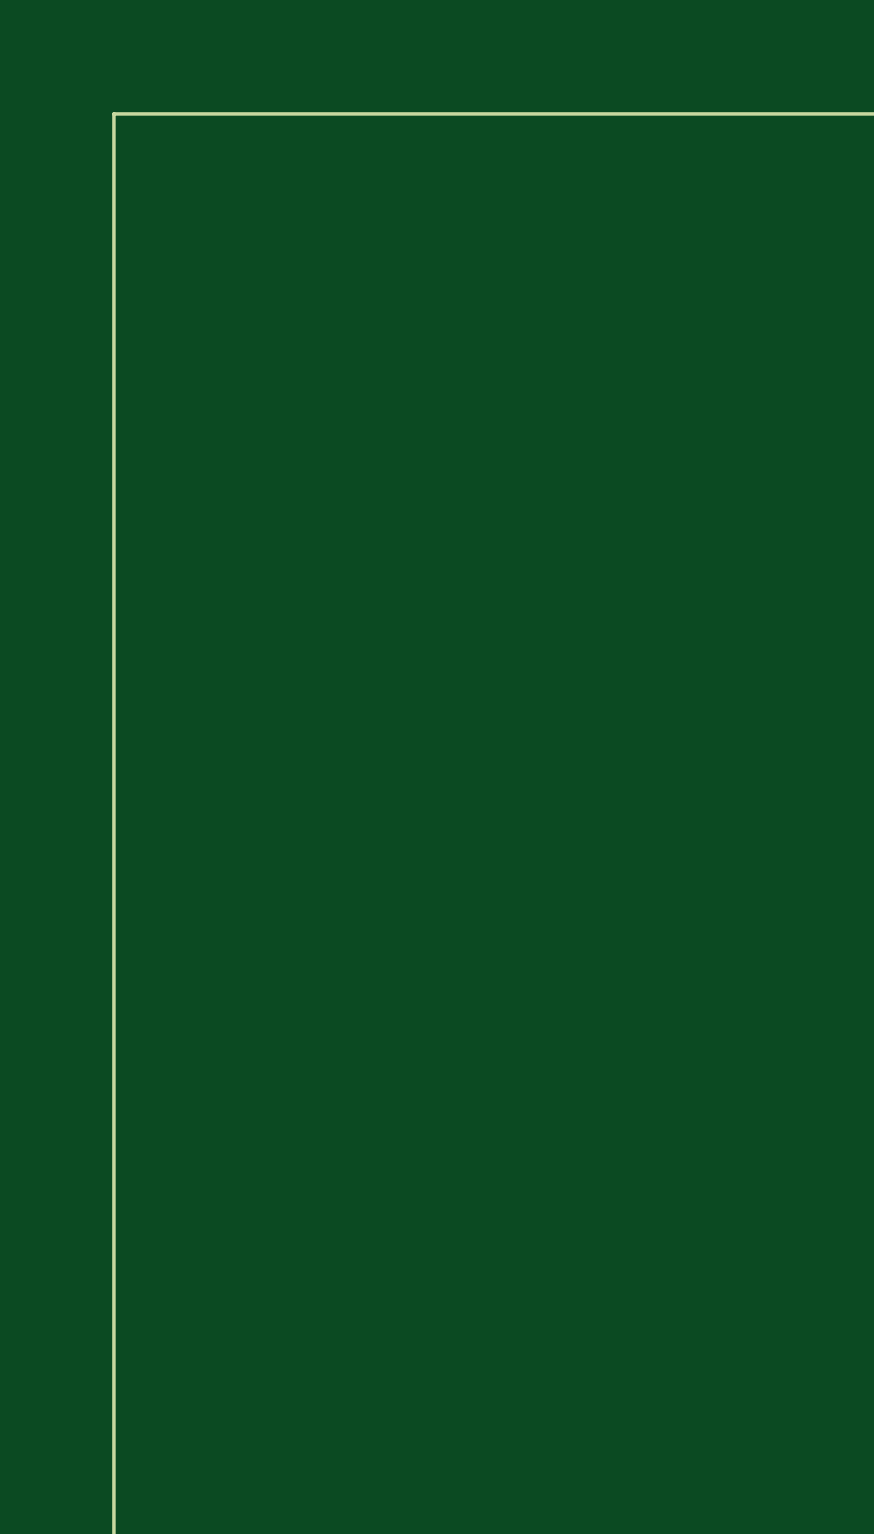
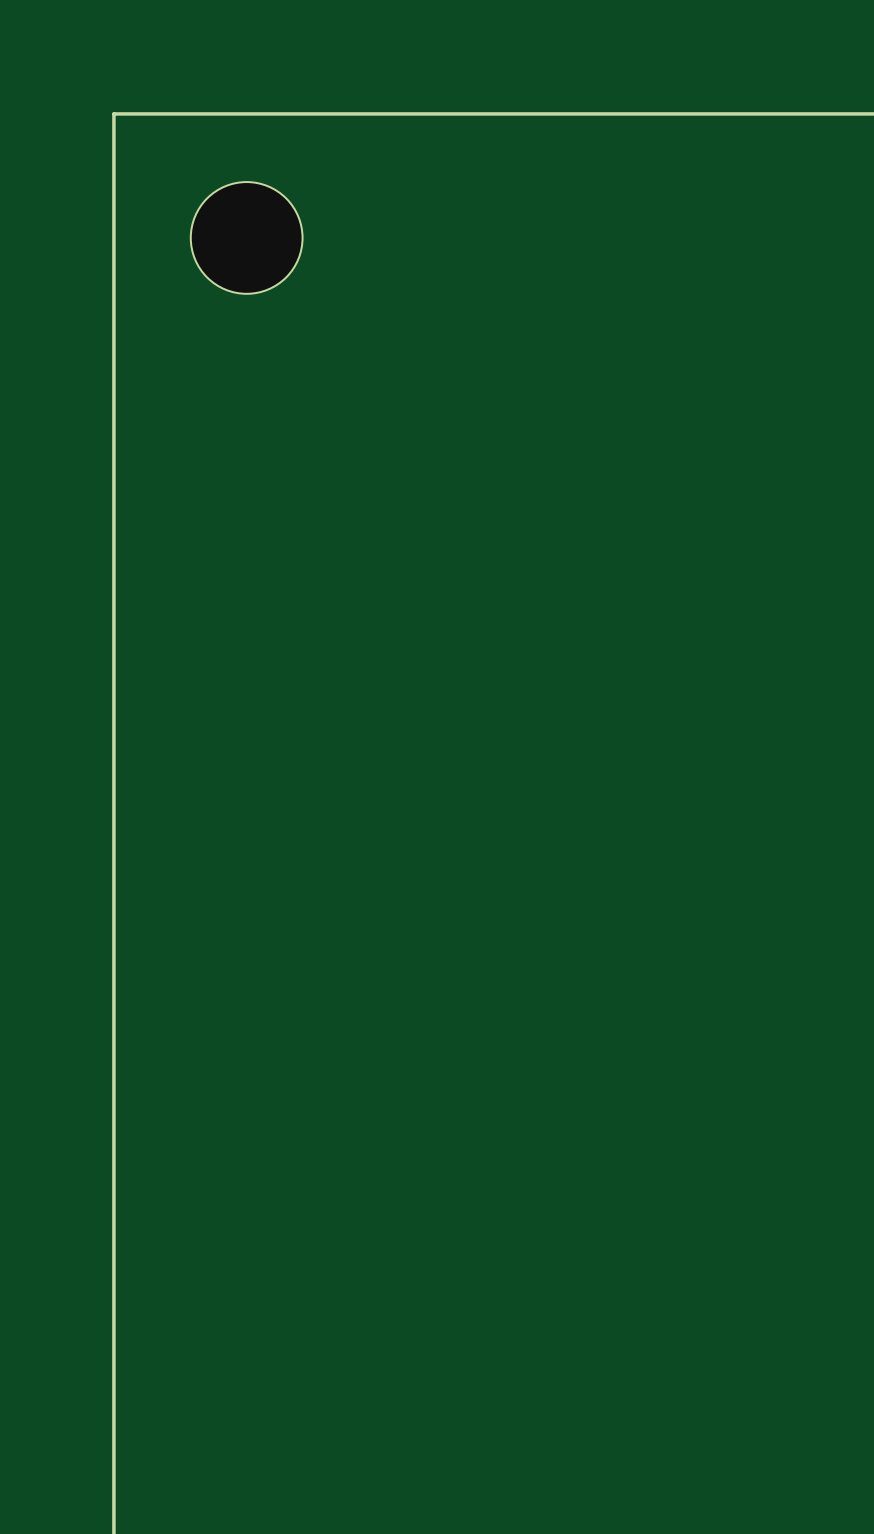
part: none -> (246, 237)

